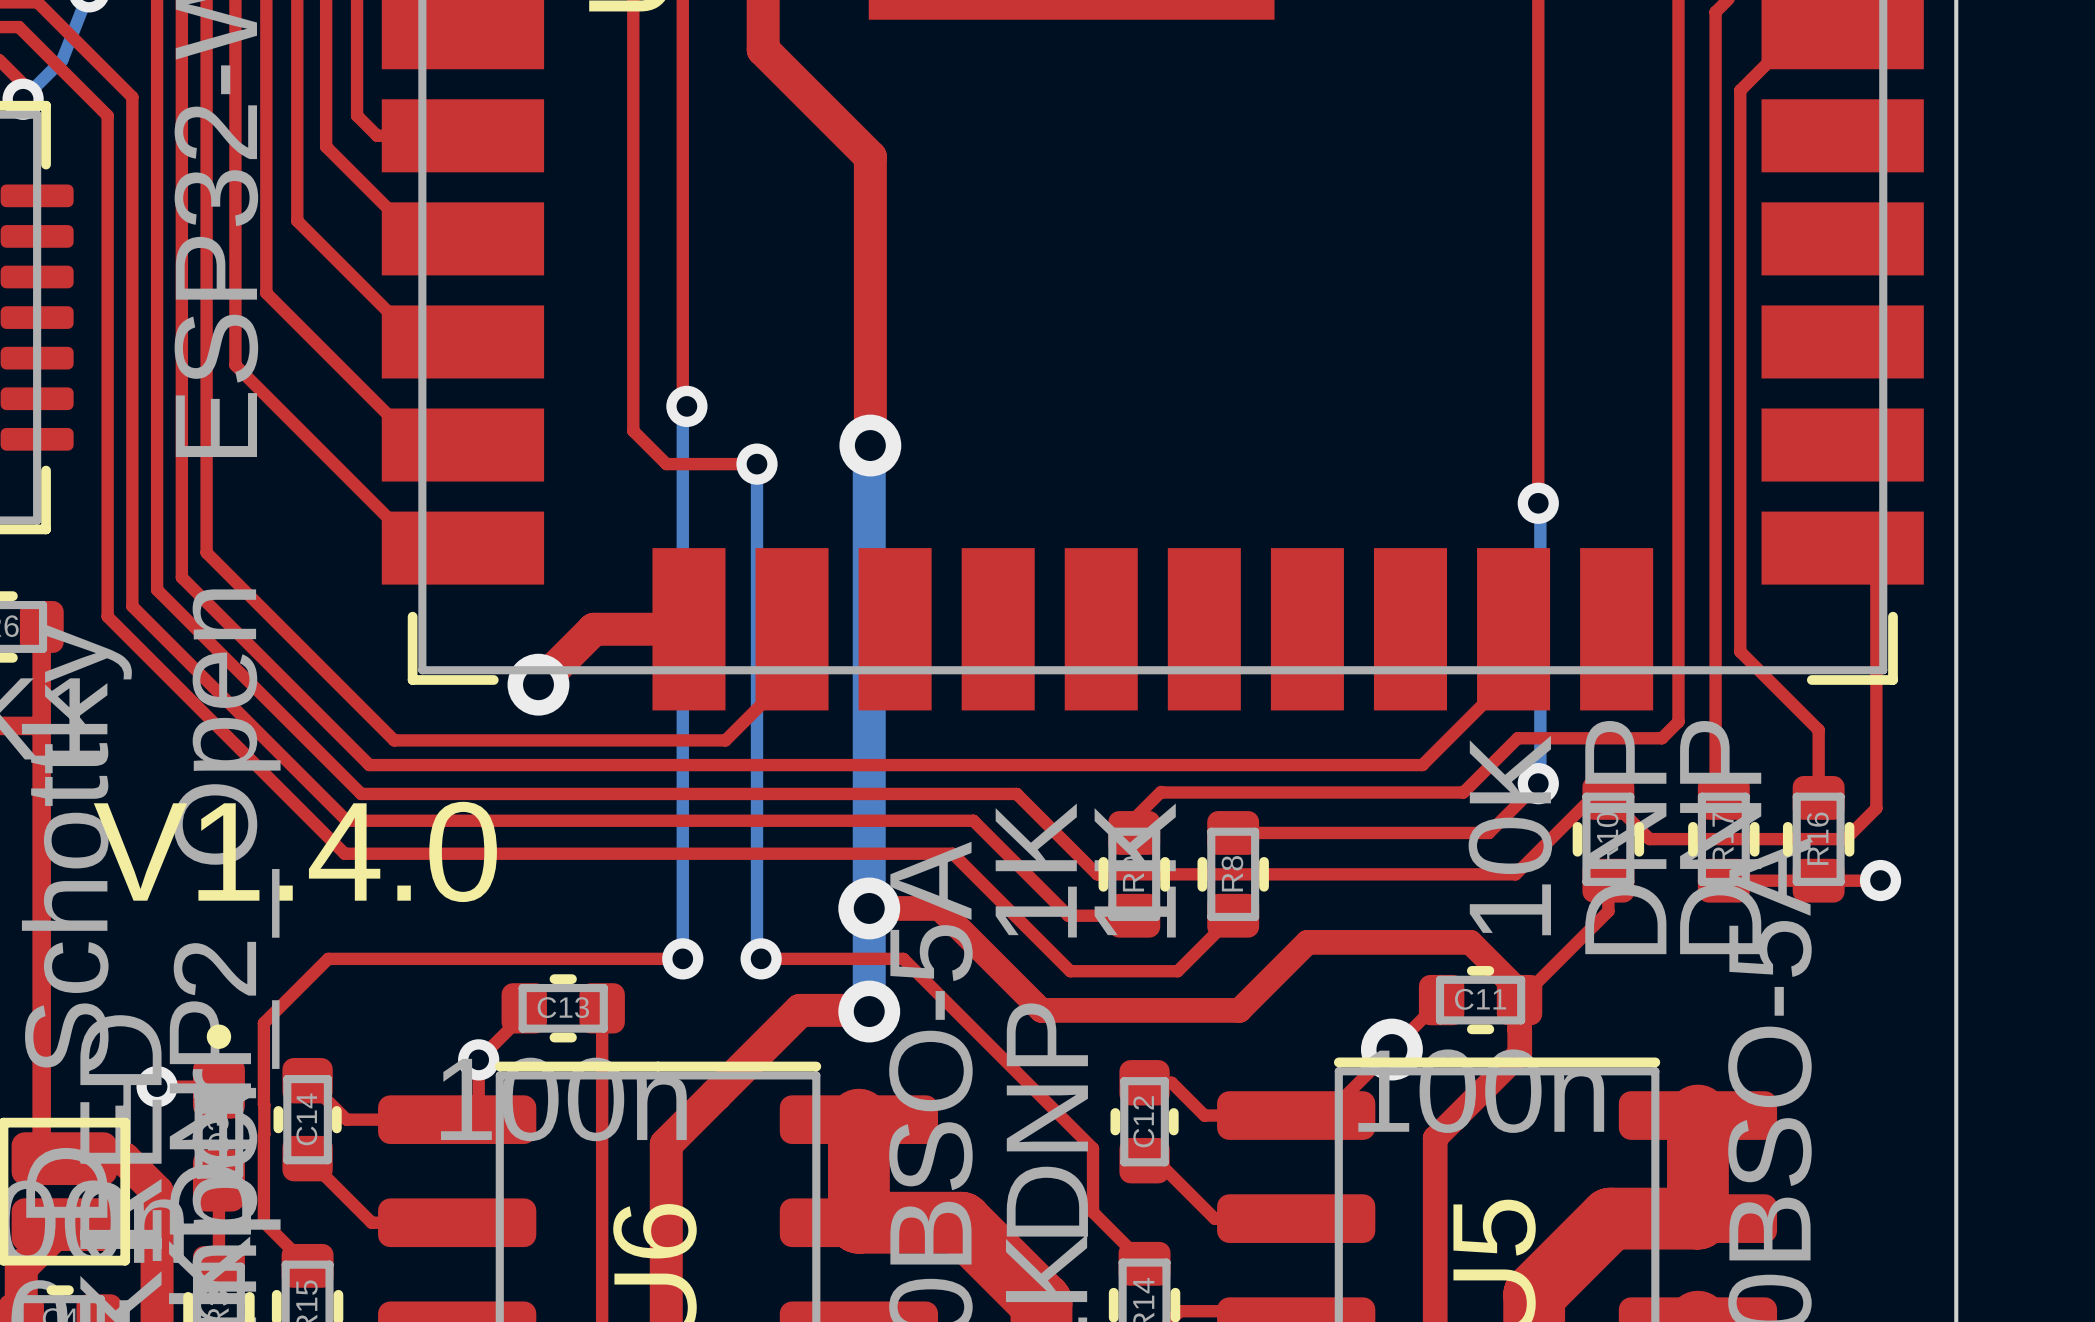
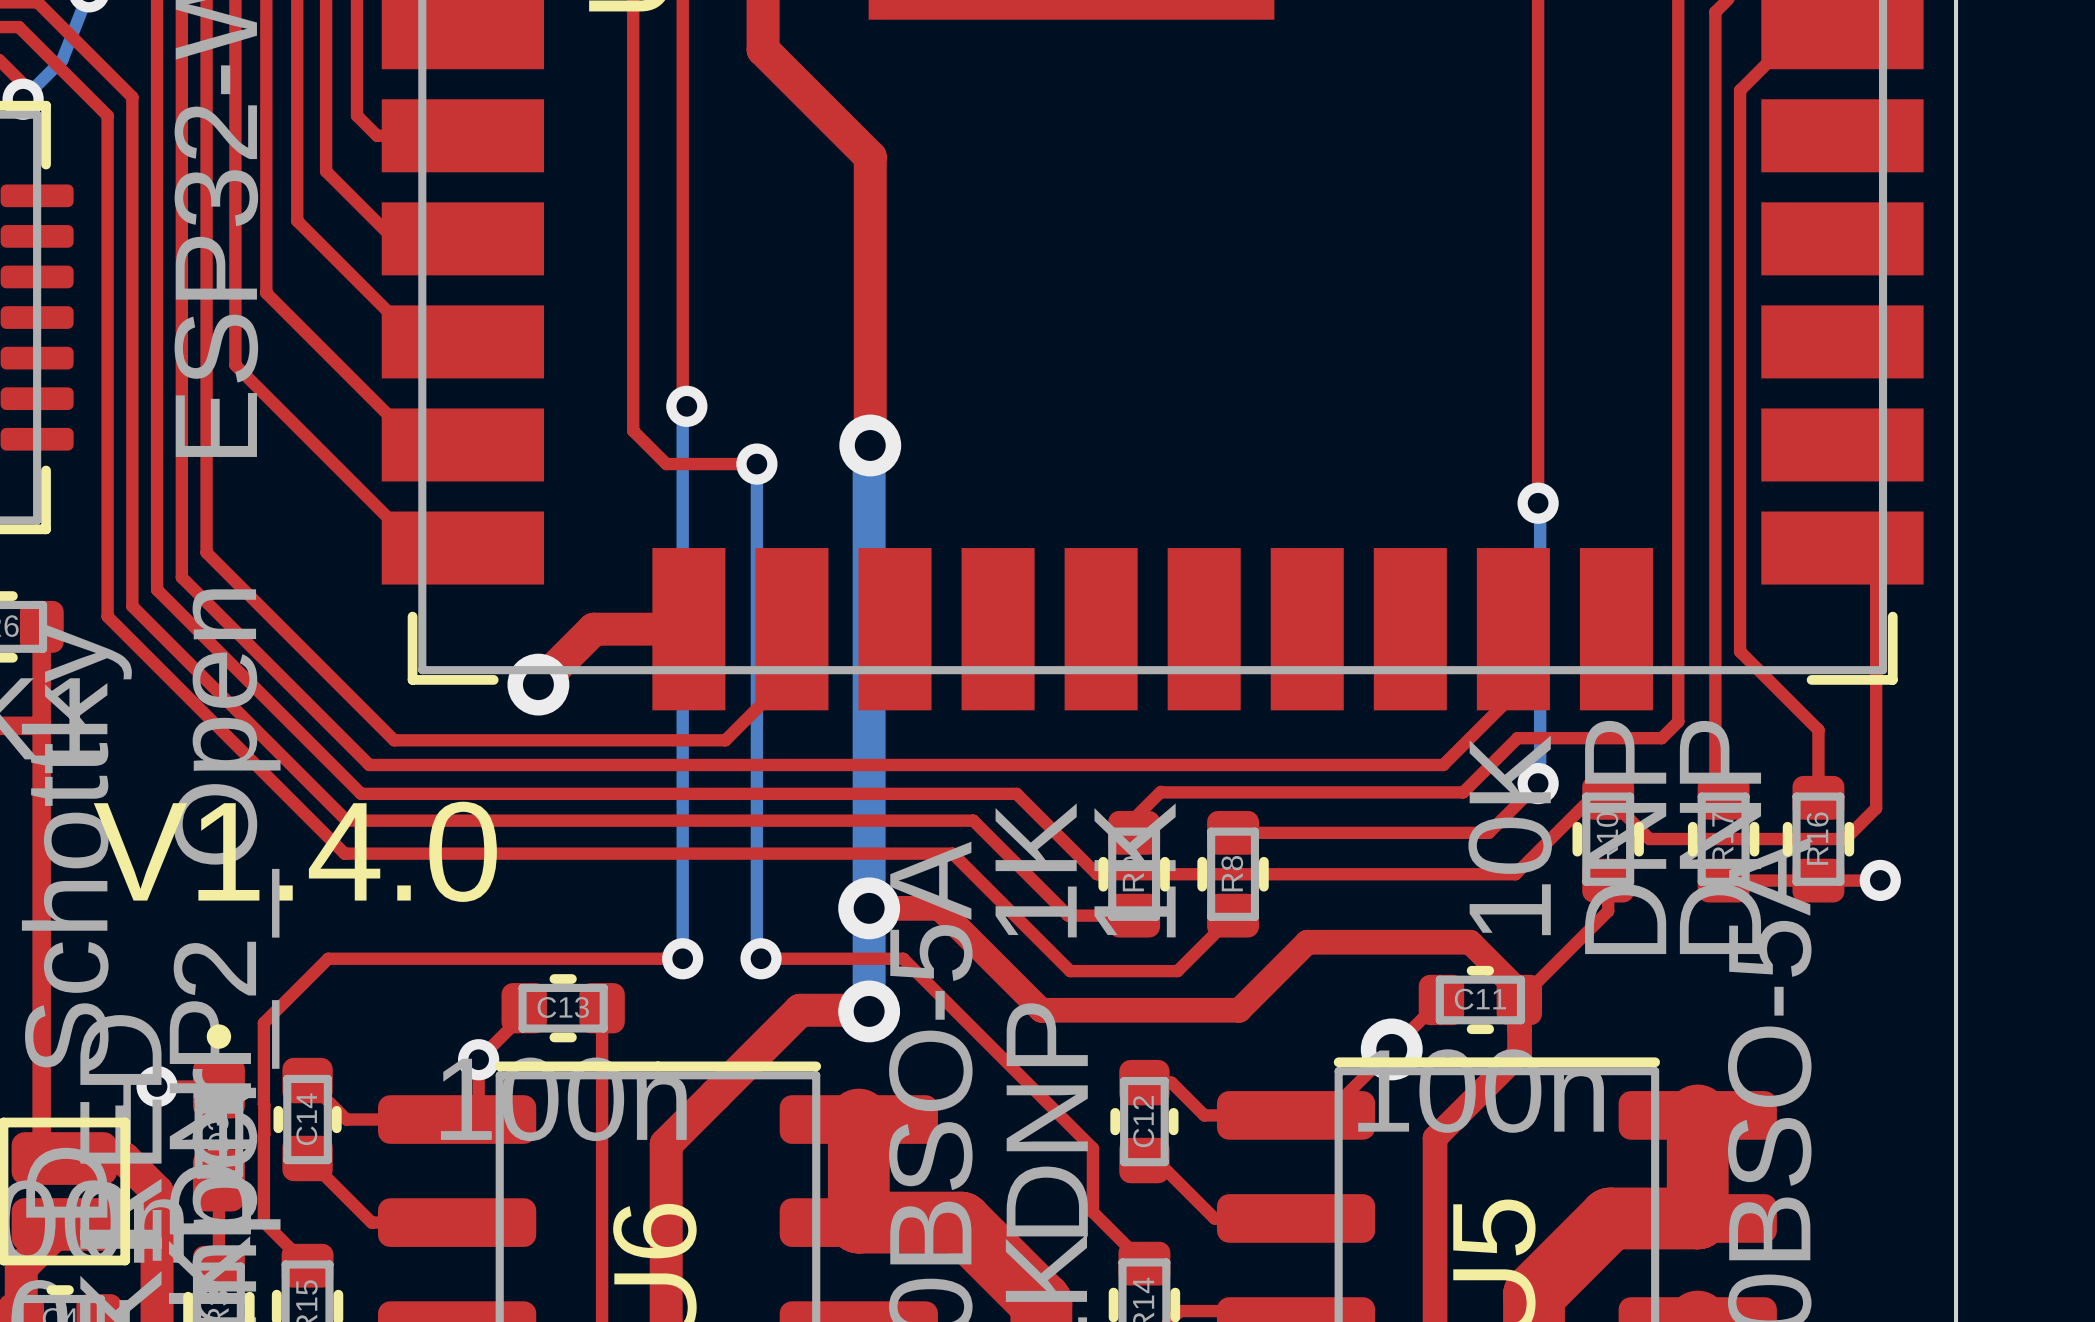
top track: (326, 146) (418, 238) -> (326, 146) (326, 171) (393, 238) (418, 238)
top track: (1513, 673) (1422, 765) -> (1513, 673) (1513, 694) (1443, 765) (1422, 765)

